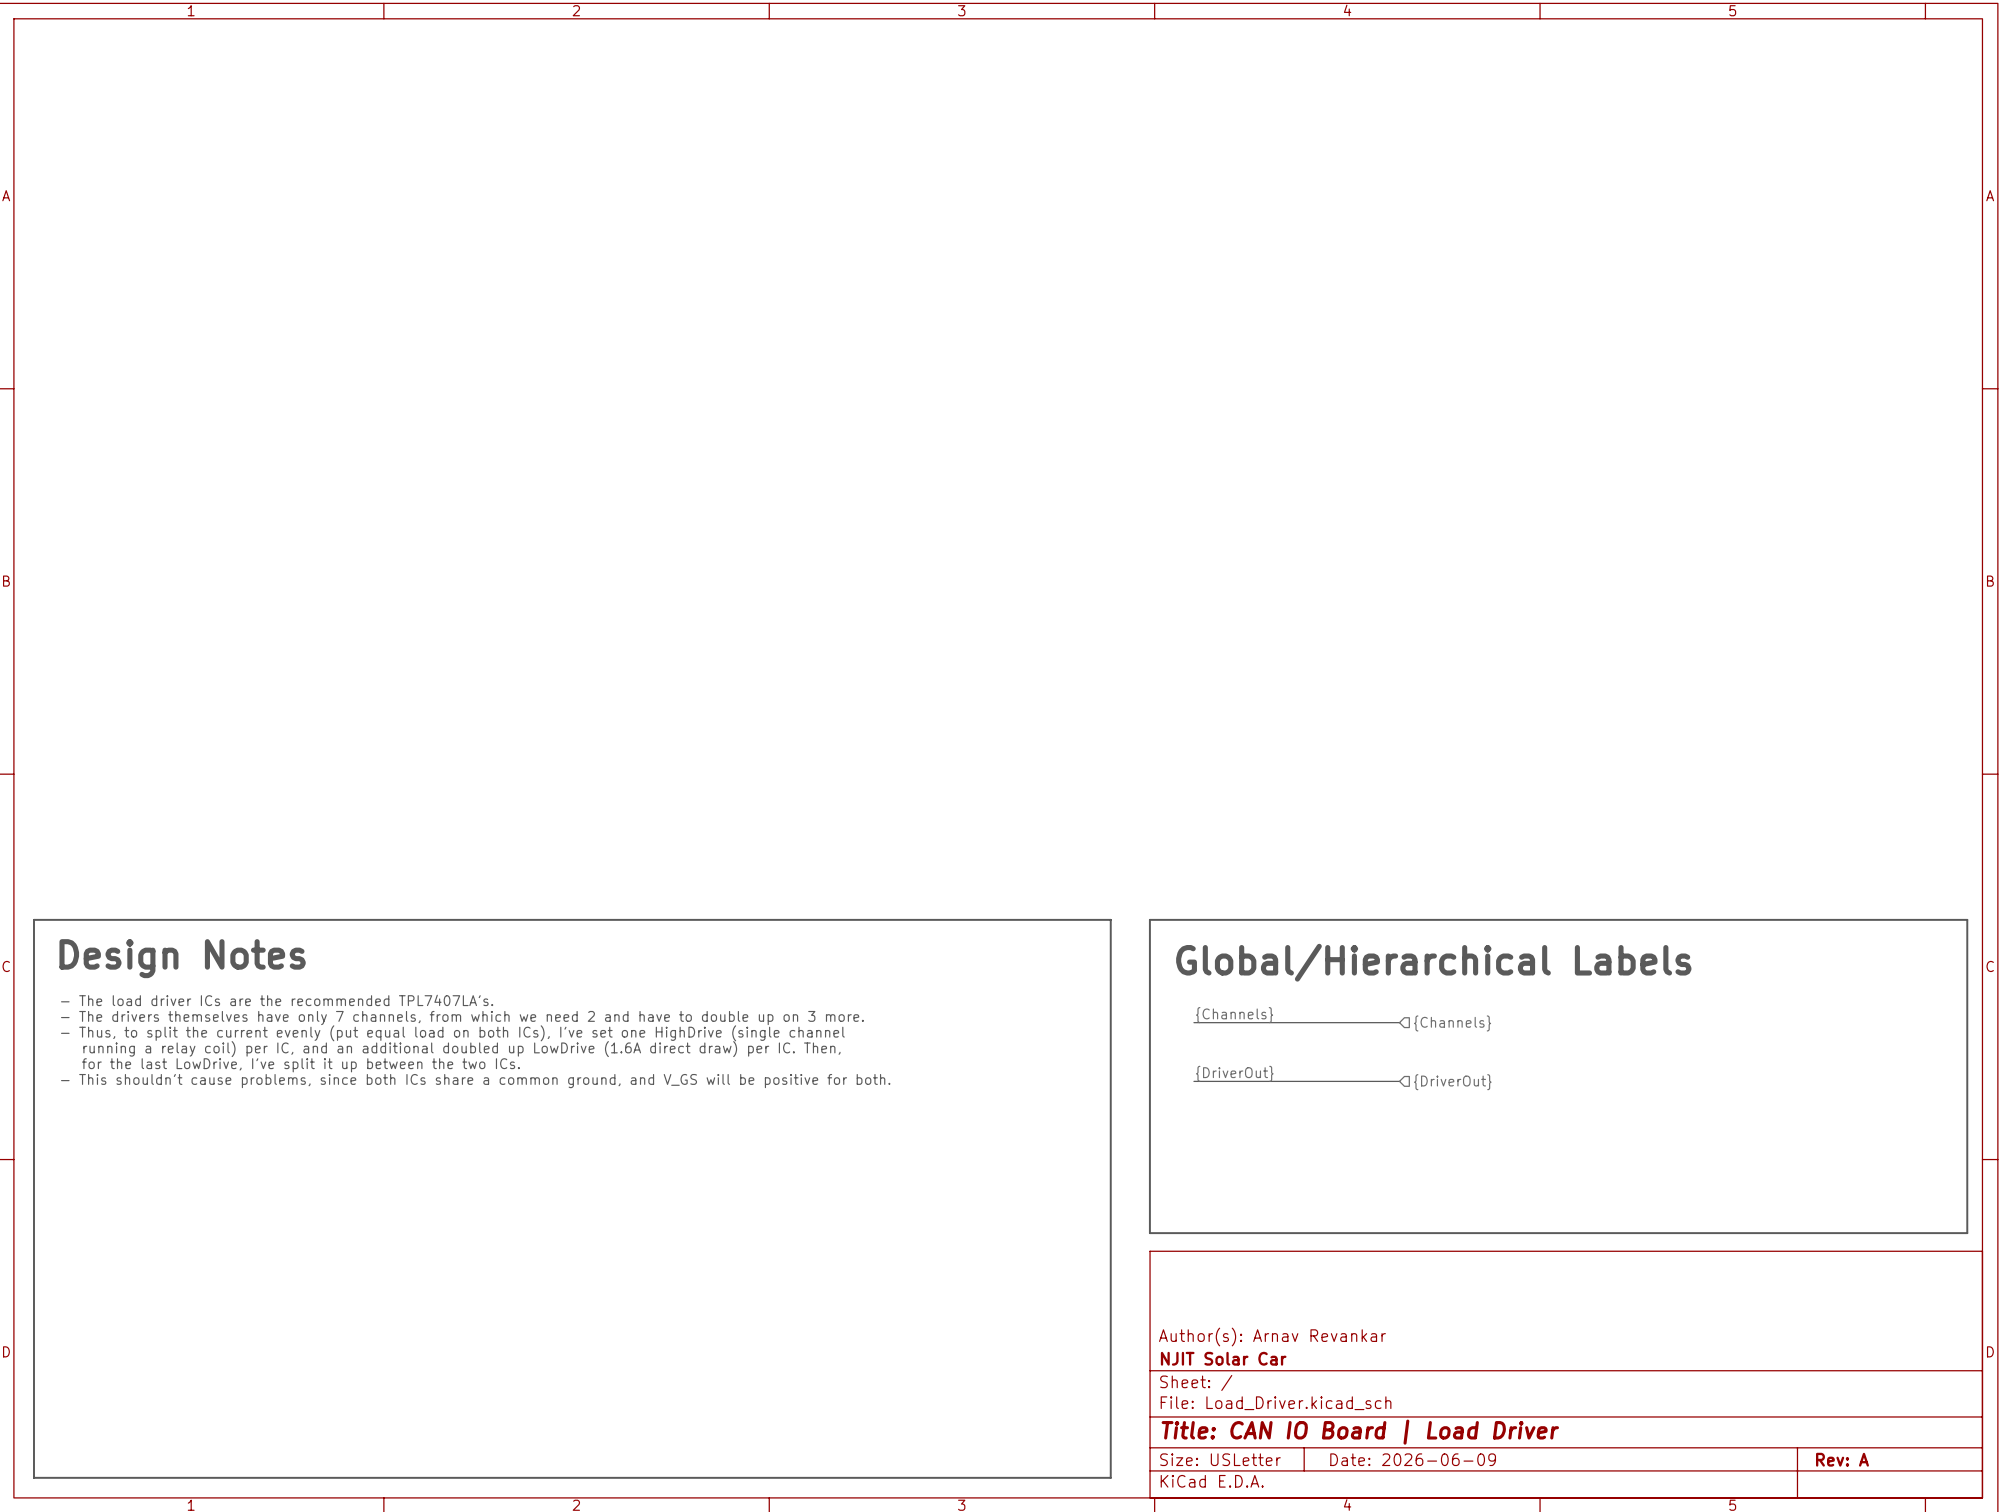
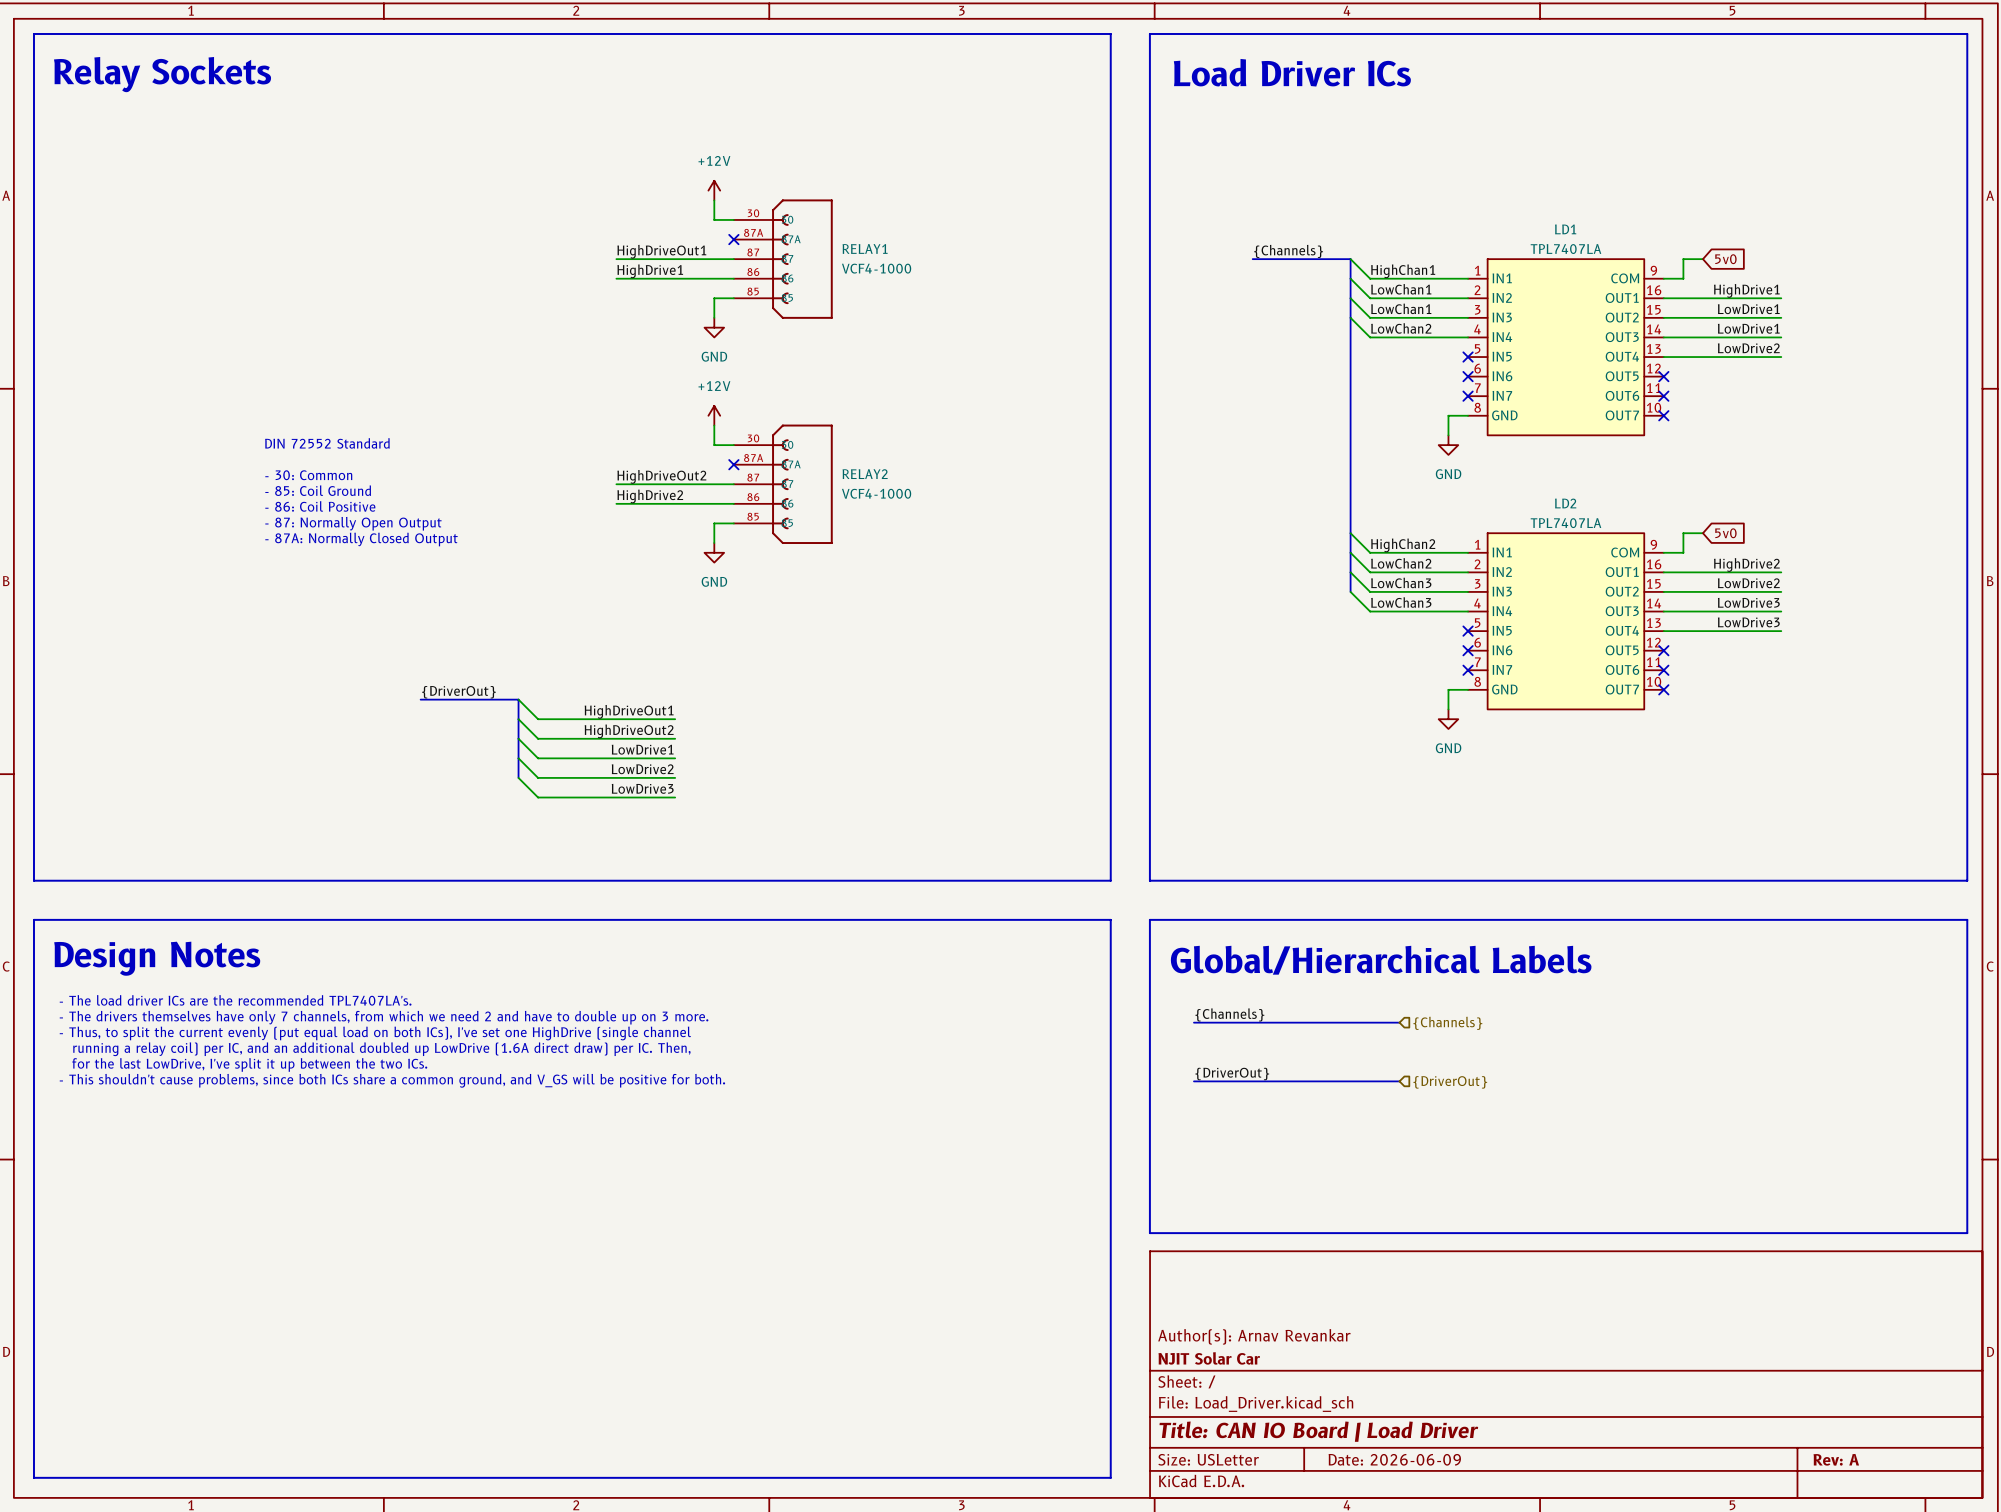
line: none -> (33, 33) (1110, 33) (1110, 880) (33, 880) (33, 33)
line: none -> (1149, 33) (1967, 33) (1967, 880) (1149, 880) (1149, 33)
text: none -> Load Driver ICs (1292, 72)
text: none -> Relay Sockets (162, 74)
power symbol: none -> +12V (714, 190)
wire: none -> (714, 200) (714, 219) (733, 219)
no-connect mark: none -> (733, 239)
label: none -> {Channels} (1288, 251)
label: none -> HighDriveOut1 (661, 251)
wire: none -> (616, 259) (733, 259)
RELAY1: none -> VCF4-1000 (783, 259)
bus: none -> (1252, 259) (1350, 259) (1350, 591)
wire: none -> (1350, 259) (1370, 278) (1468, 278)
wire: none -> (1702, 259) (1683, 259) (1683, 278) (1663, 278)
global label: none -> 5v0 (1725, 259)
label: none -> HighDrive1 (650, 271)
label: none -> HighChan1 (1403, 271)
wire: none -> (616, 278) (733, 278)
wire: none -> (1350, 278) (1370, 298) (1468, 298)
label: none -> LowChan1 (1401, 289)
label: none -> HighDrive1 (1746, 290)
wire: none -> (733, 298) (714, 298) (714, 317)
wire: none -> (1350, 298) (1370, 317) (1468, 317)
wire: none -> (1663, 298) (1781, 298)
label: none -> LowChan1 (1401, 308)
label: none -> LowDrive1 (1748, 309)
wire: none -> (1350, 317) (1370, 337) (1468, 337)
wire: none -> (1663, 317) (1781, 317)
power symbol: none -> GND (714, 327)
label: none -> LowChan2 (1401, 328)
label: none -> LowDrive1 (1748, 328)
wire: none -> (1663, 337) (1781, 337)
LD1: none -> TPL7407LA (1565, 347)
label: none -> LowDrive2 (1748, 348)
no-connect mark: none -> (1468, 357)
wire: none -> (1663, 357) (1781, 357)
no-connect mark: none -> (1468, 376)
no-connect mark: none -> (1663, 376)
no-connect mark: none -> (1468, 396)
no-connect mark: none -> (1663, 396)
power symbol: none -> +12V (714, 415)
wire: none -> (1468, 415) (1448, 415) (1448, 435)
no-connect mark: none -> (1663, 415)
wire: none -> (714, 425) (714, 445) (733, 445)
text: none -> DIN 72552 Standard (327, 443)
power symbol: none -> GND (1448, 445)
no-connect mark: none -> (733, 464)
text: none -> - 30: Common (308, 475)
label: none -> HighDriveOut2 (661, 476)
wire: none -> (616, 484) (733, 484)
RELAY2: none -> VCF4-1000 (783, 484)
text: none -> - 85: Coil Ground (318, 490)
label: none -> HighDrive2 (650, 496)
wire: none -> (616, 503) (733, 503)
text: none -> - 86: Coil Positive (320, 506)
wire: none -> (733, 523) (714, 523) (714, 543)
text: none -> - 87: Normally Open Output (353, 523)
wire: none -> (1350, 533) (1370, 552) (1468, 552)
wire: none -> (1702, 533) (1683, 533) (1683, 552) (1663, 552)
global label: none -> 5v0 (1725, 533)
text: none -> - 87A: Normally Closed Output (361, 539)
label: none -> HighChan2 (1403, 545)
power symbol: none -> GND (714, 552)
wire: none -> (1350, 552) (1370, 572) (1468, 572)
label: none -> LowChan2 (1401, 563)
label: none -> HighDrive2 (1746, 564)
wire: none -> (1350, 572) (1370, 591) (1468, 591)
wire: none -> (1663, 572) (1781, 572)
label: none -> LowChan3 (1401, 582)
label: none -> LowDrive2 (1748, 583)
wire: none -> (1350, 591) (1370, 611) (1468, 611)
wire: none -> (1663, 591) (1781, 591)
label: none -> LowChan3 (1401, 602)
label: none -> LowDrive3 (1748, 602)
wire: none -> (1663, 611) (1781, 611)
LD2: none -> TPL7407LA (1565, 621)
label: none -> LowDrive3 (1748, 622)
no-connect mark: none -> (1468, 631)
wire: none -> (1663, 631) (1781, 631)
no-connect mark: none -> (1468, 650)
no-connect mark: none -> (1663, 650)
no-connect mark: none -> (1468, 670)
no-connect mark: none -> (1663, 670)
wire: none -> (1468, 689) (1448, 689) (1448, 709)
no-connect mark: none -> (1663, 689)
label: none -> {DriverOut} (458, 692)
bus: none -> (420, 699) (518, 699) (518, 777)
wire: none -> (518, 699) (538, 719) (675, 719)
label: none -> HighDriveOut1 (629, 711)
wire: none -> (518, 719) (538, 738) (675, 738)
power symbol: none -> GND (1448, 719)
label: none -> HighDriveOut2 (629, 731)
wire: none -> (518, 738) (538, 758) (675, 758)
label: none -> LowDrive1 (642, 749)
wire: none -> (518, 758) (538, 777) (675, 777)
label: none -> LowDrive2 (642, 769)
wire: none -> (518, 777) (538, 797) (675, 797)
label: none -> LowDrive3 (642, 788)

